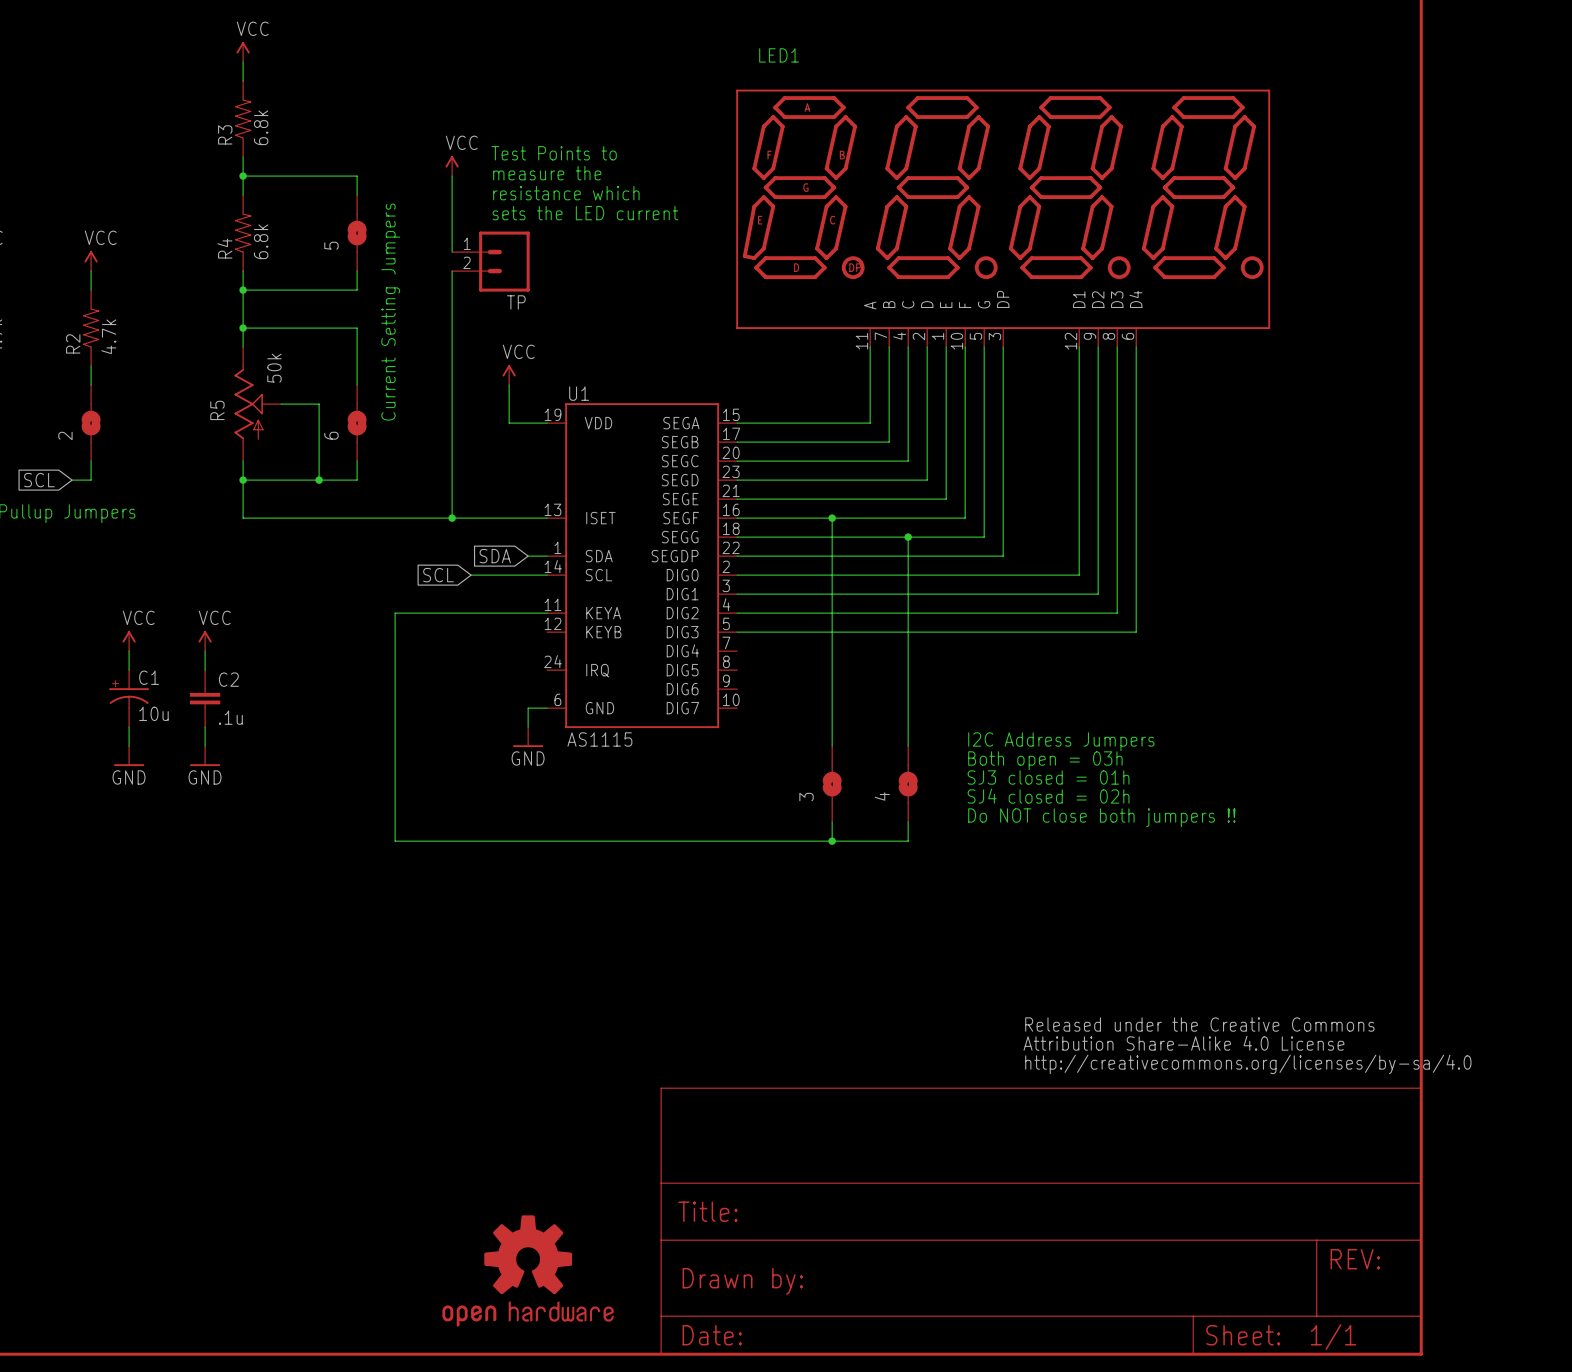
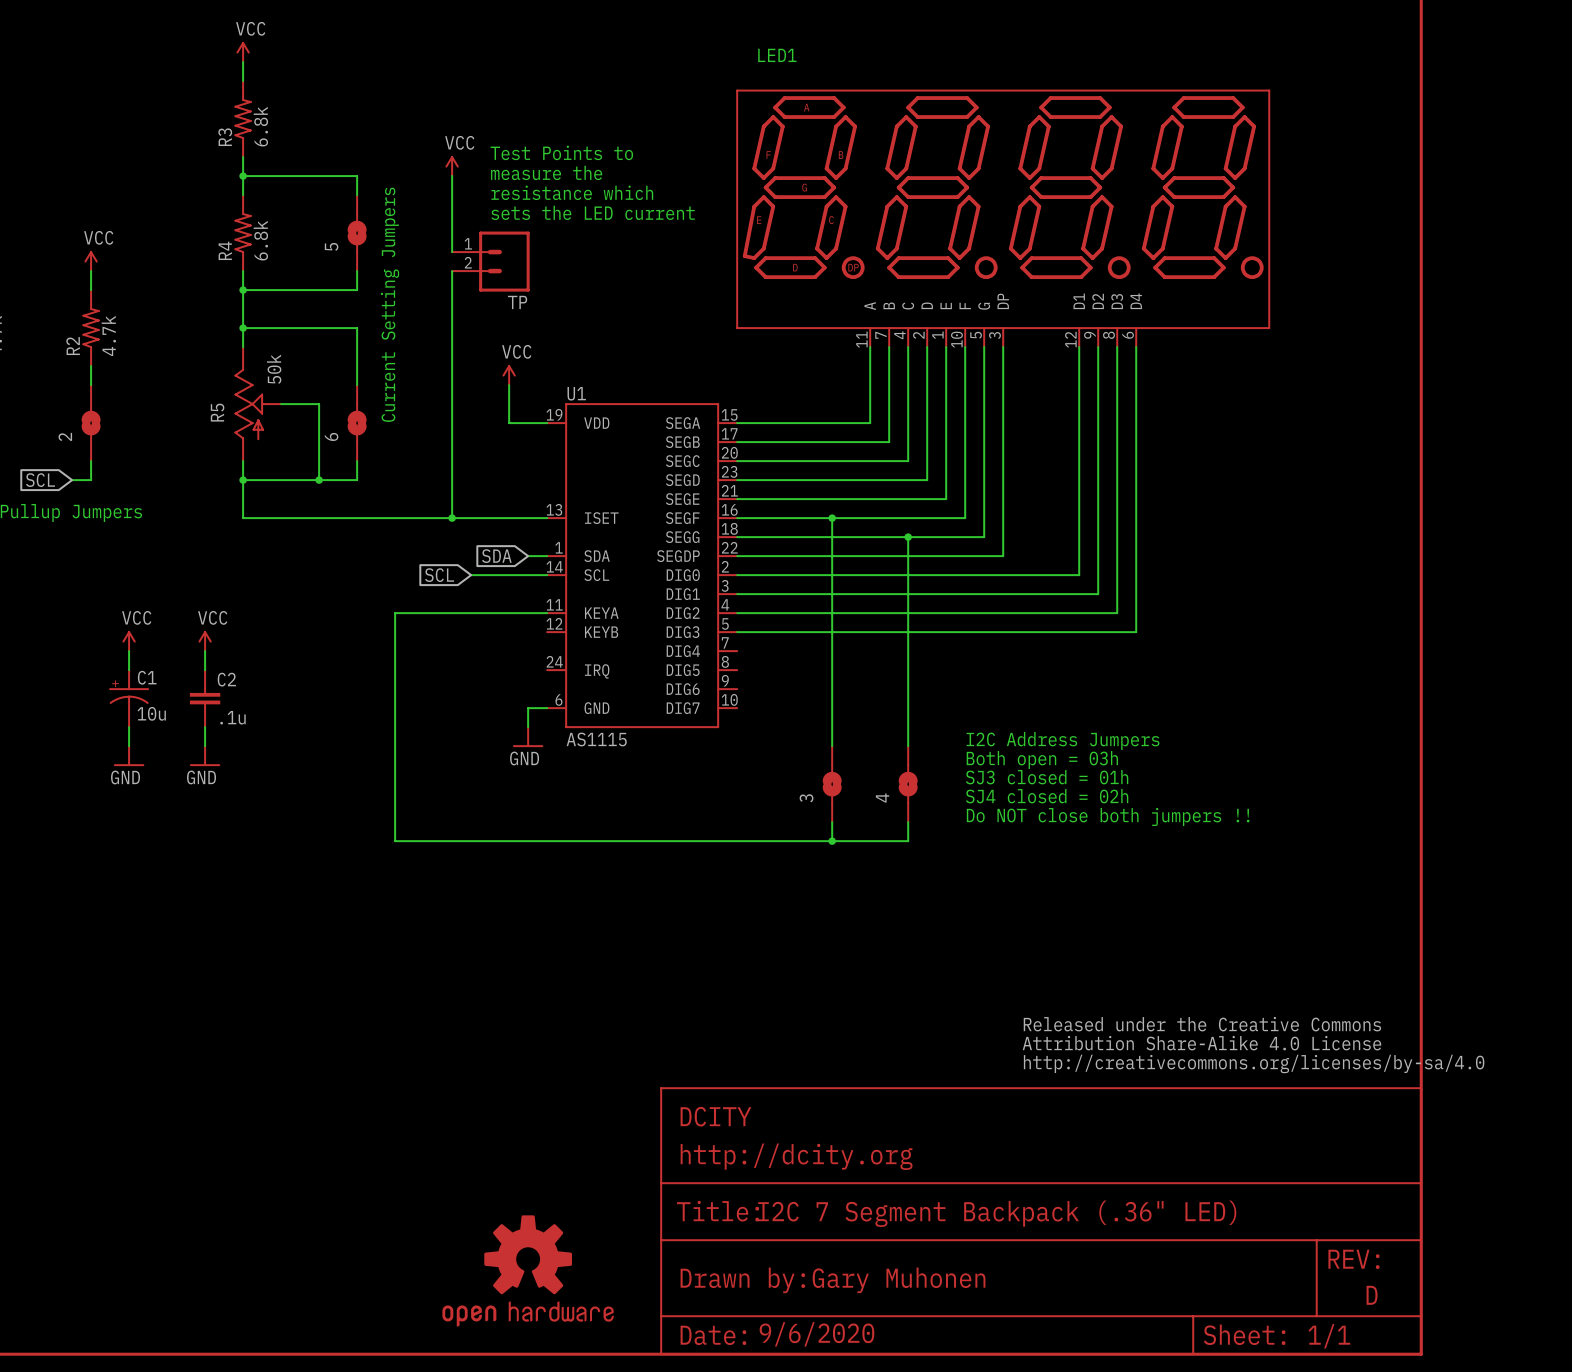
part text: none -> DCITY (715, 1116)
part text: none -> http://dcity.org (796, 1156)
part text: none -> I2C 7 Segment Backpack (.36" LED) (997, 1213)
part text: none -> Gary Muhonen (899, 1280)
part text: none -> D (1372, 1295)
part text: none -> 9/6/2020 (816, 1334)

